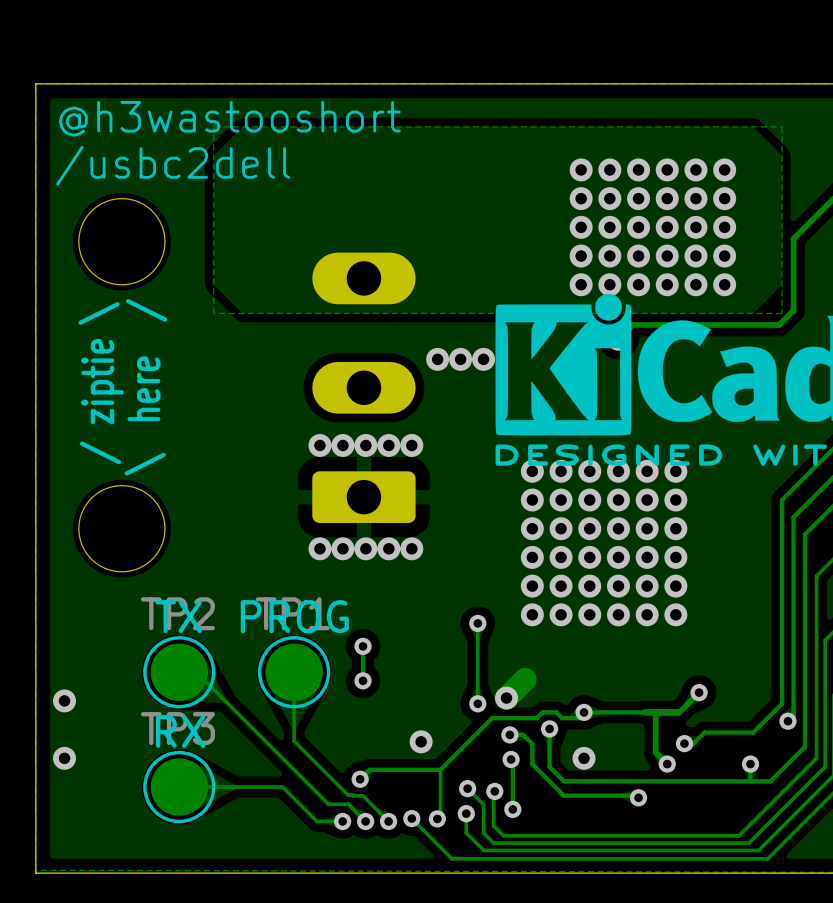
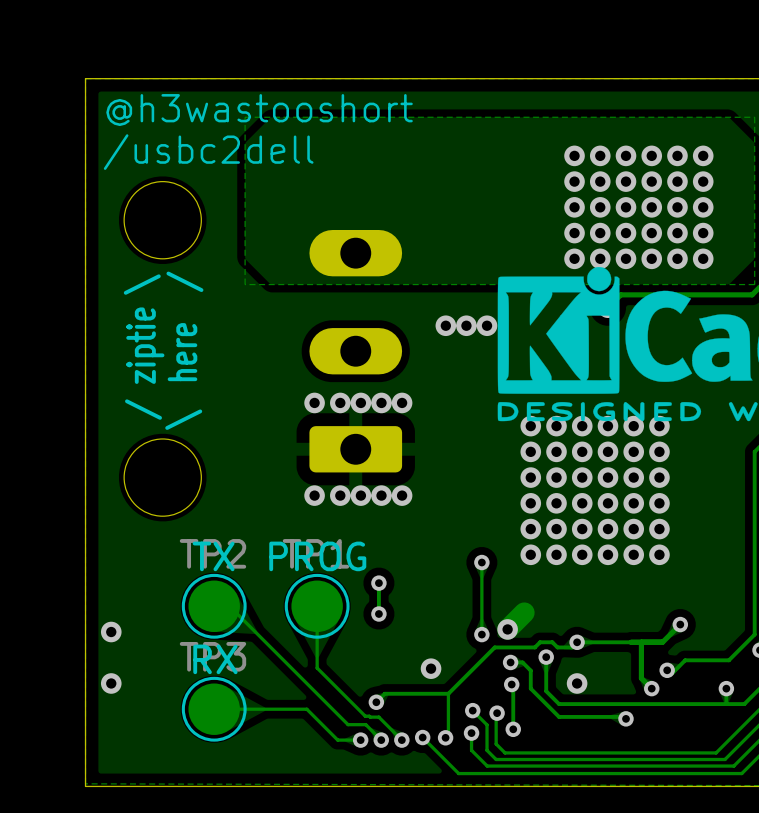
part footprint: [312, 252, 416, 523] -> [309, 230, 403, 473]
via: none -> (314, 402)
via: (411, 445) -> none
via: none -> (314, 495)
via: (411, 548) -> none

